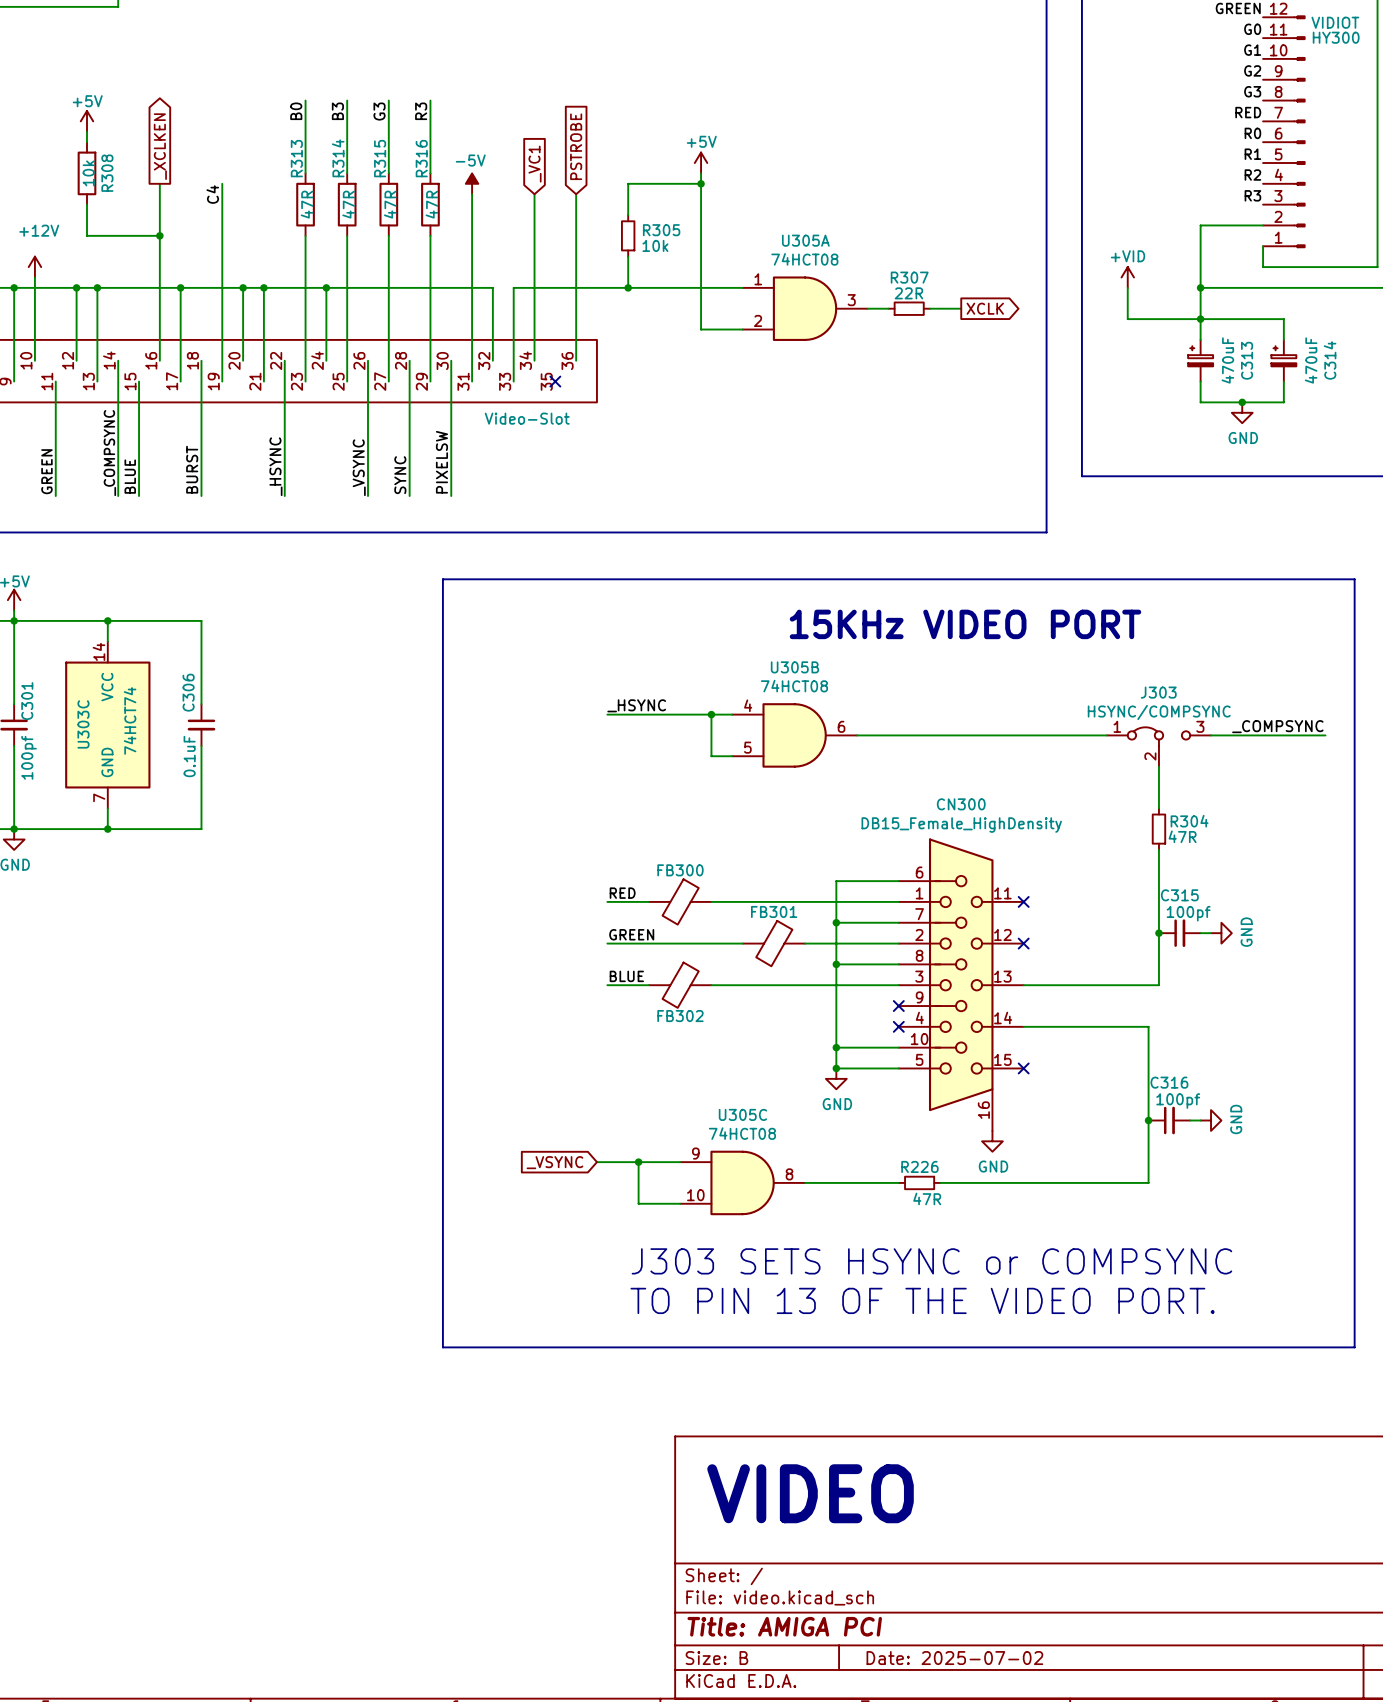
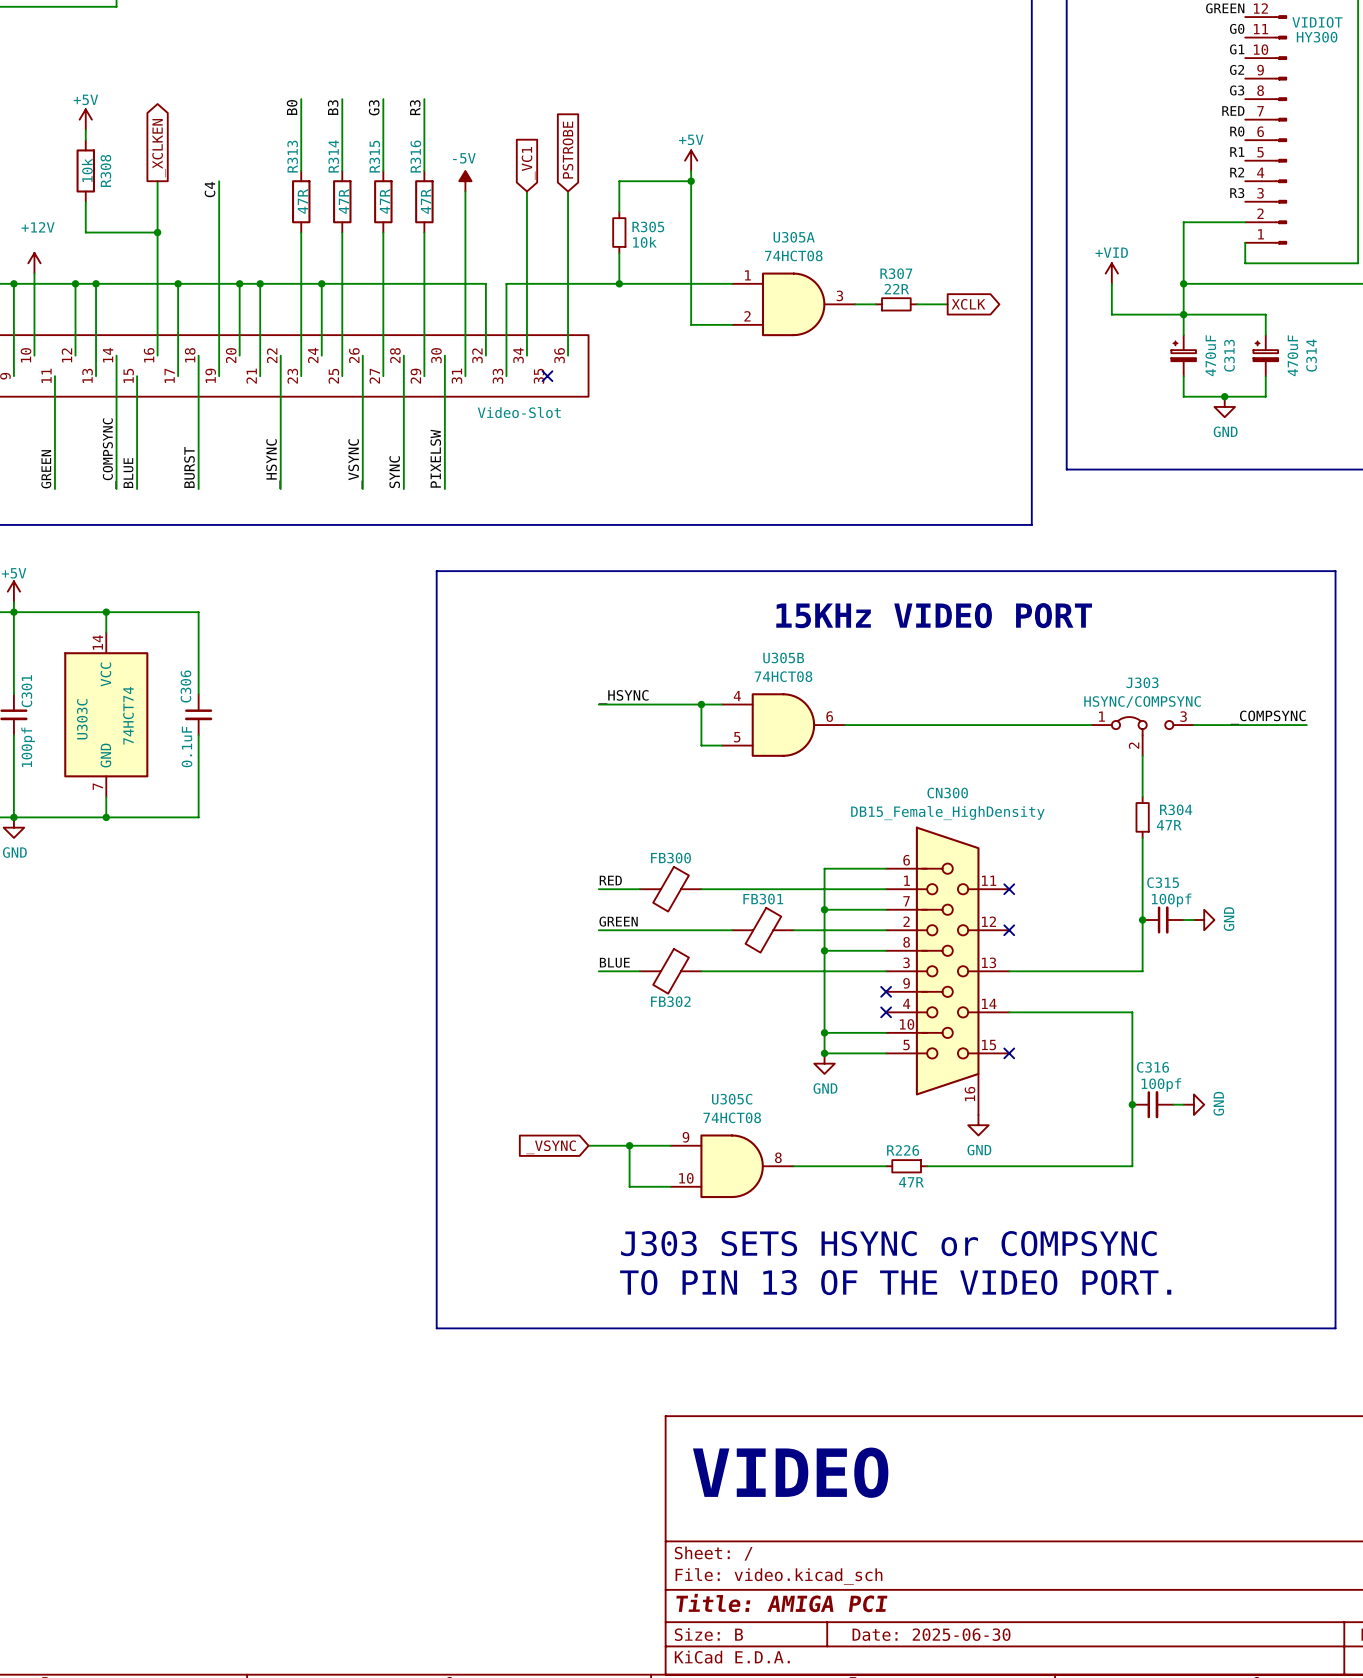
title block: Date: 2025-07-02 (954, 1658) -> Date: 2025-06-30 (931, 1634)

